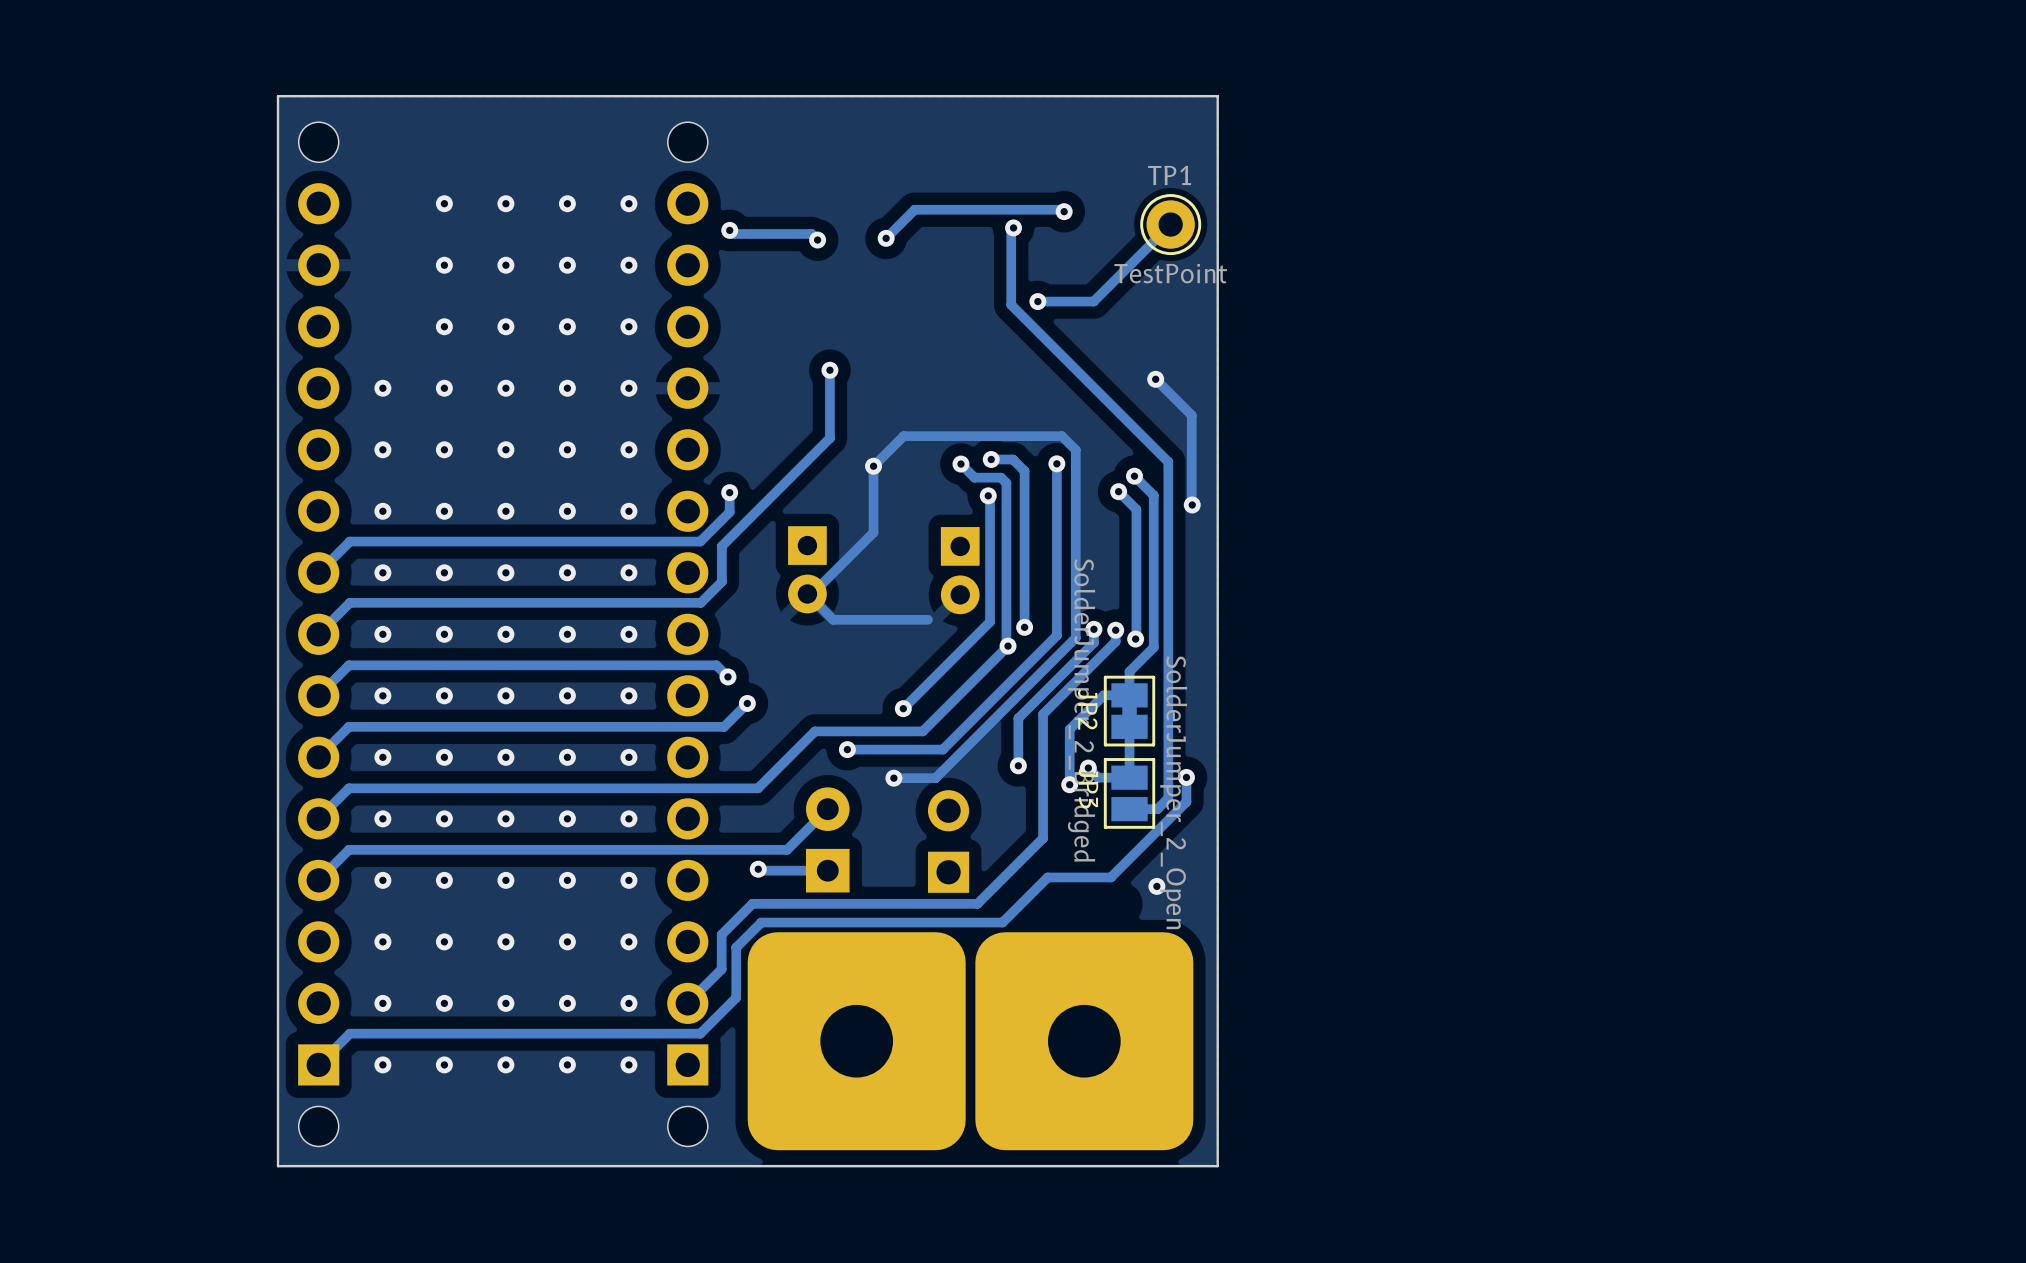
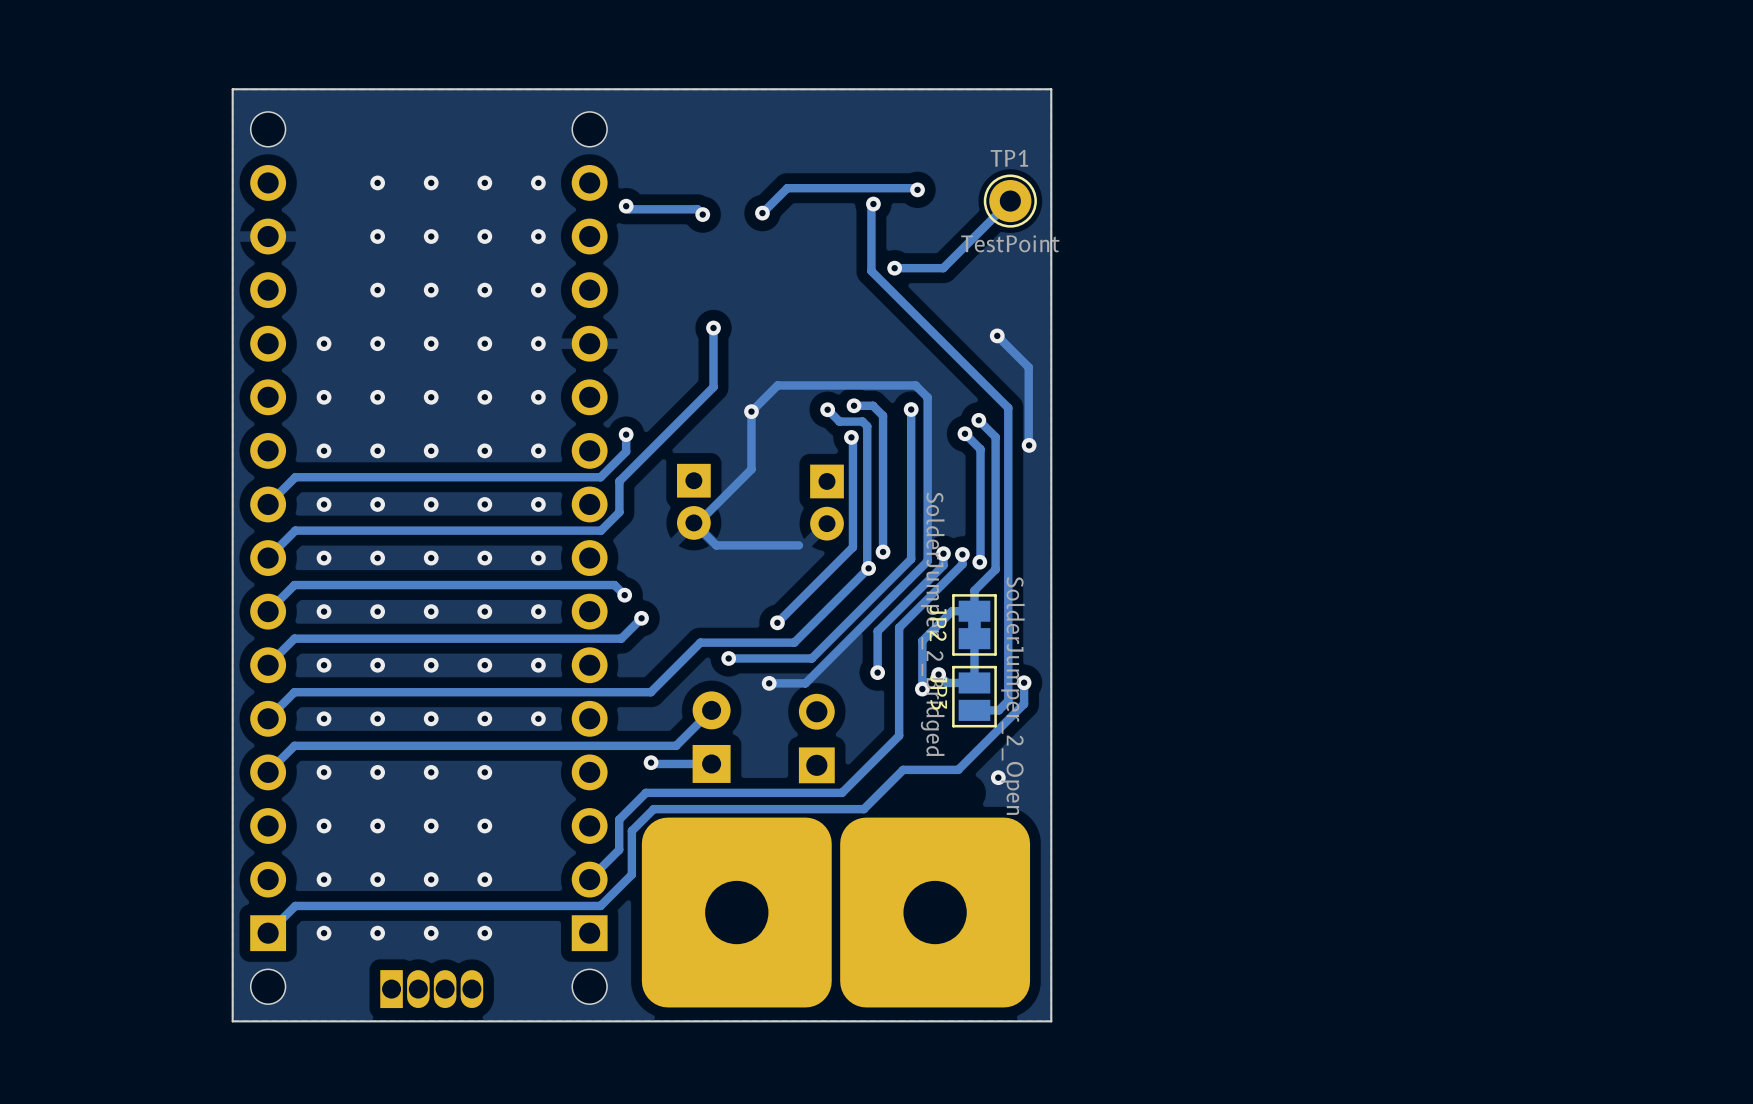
via: (628, 880) -> none
via: (628, 941) -> none
via: (628, 1003) -> none
via: (628, 1064) -> none
part: none -> (431, 989)

